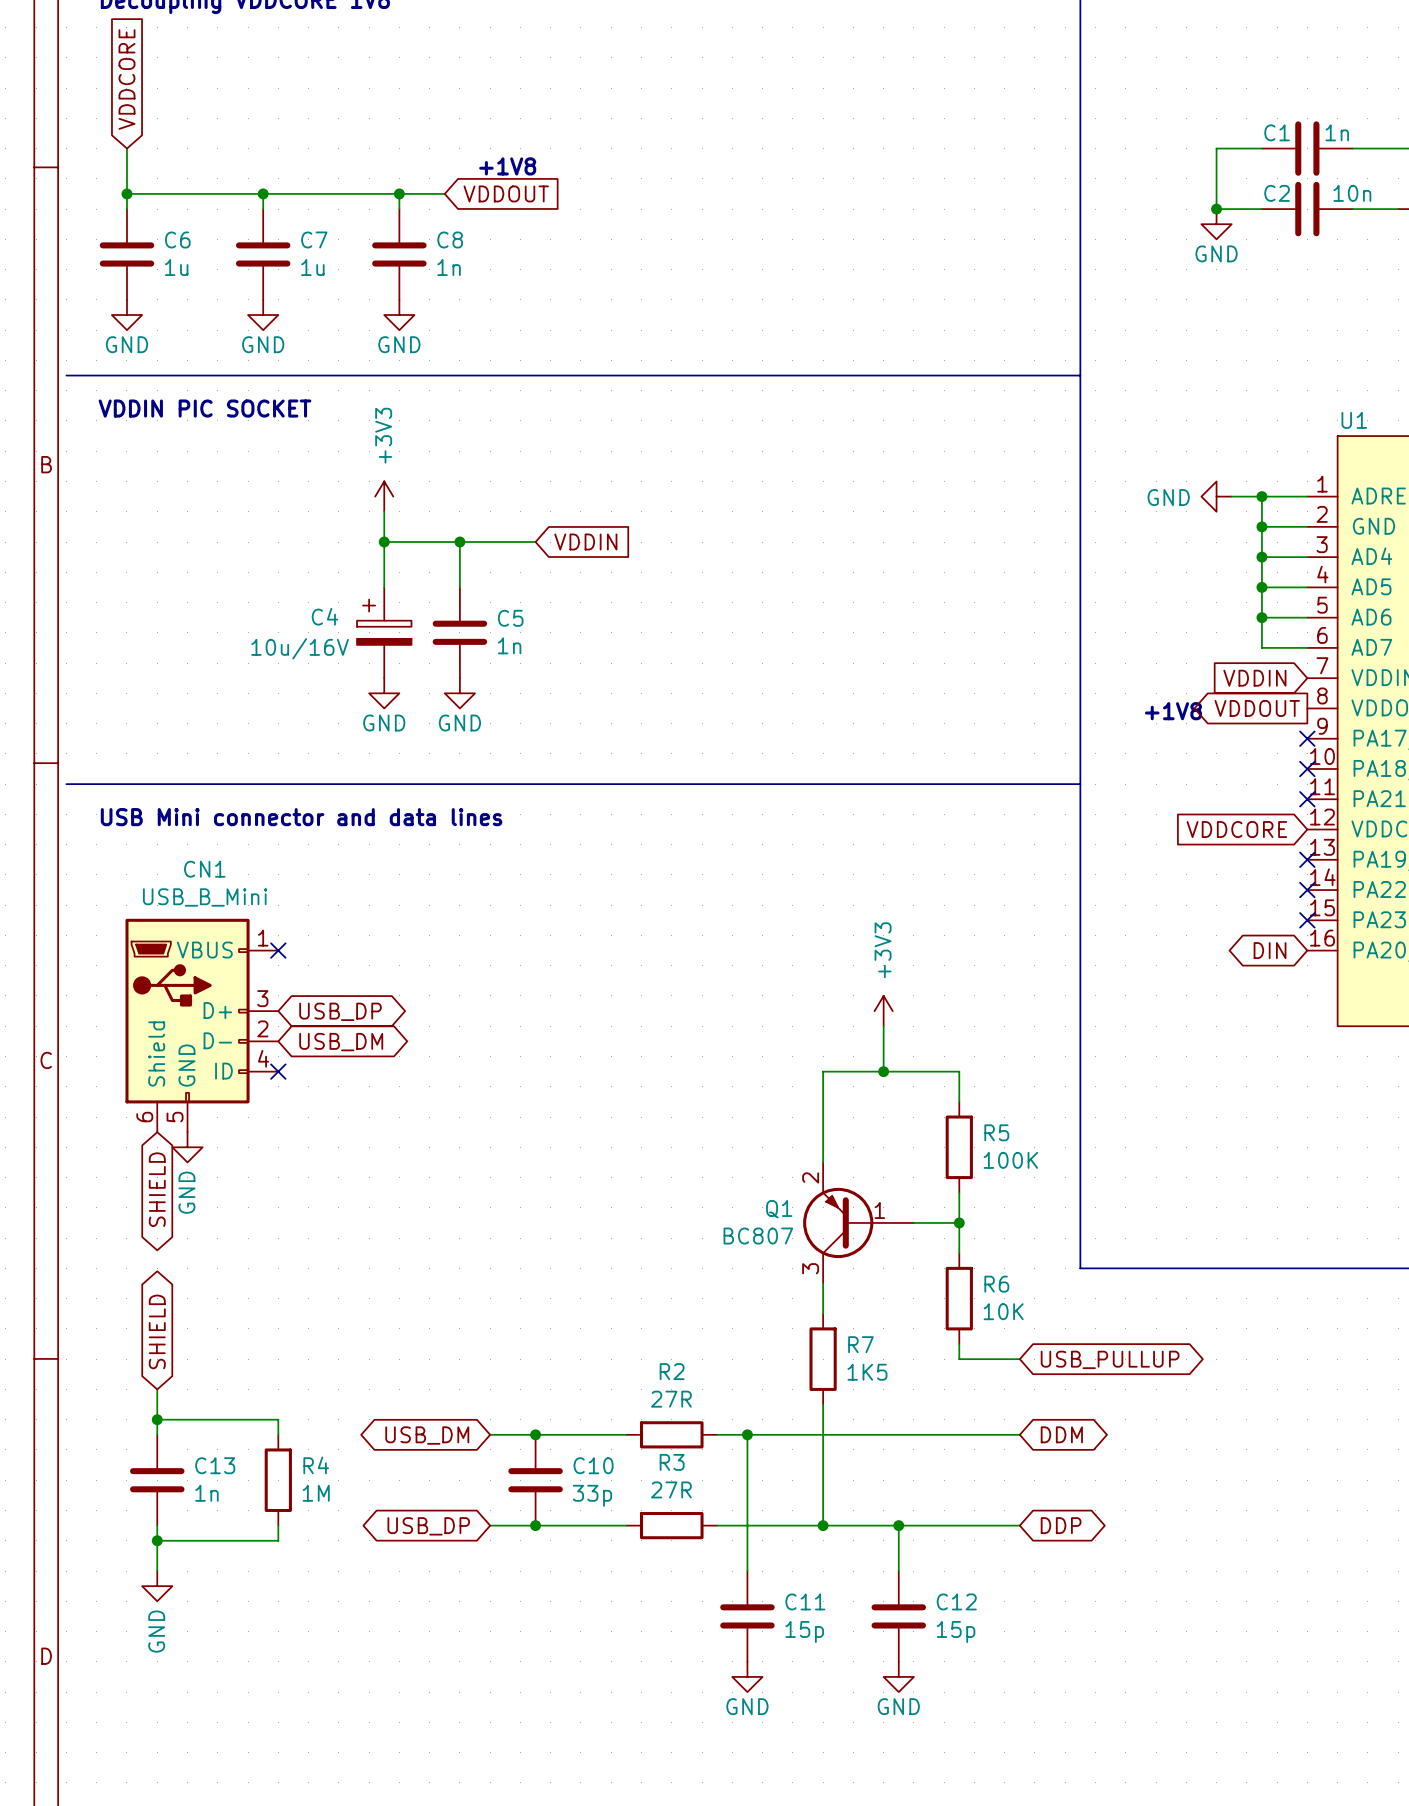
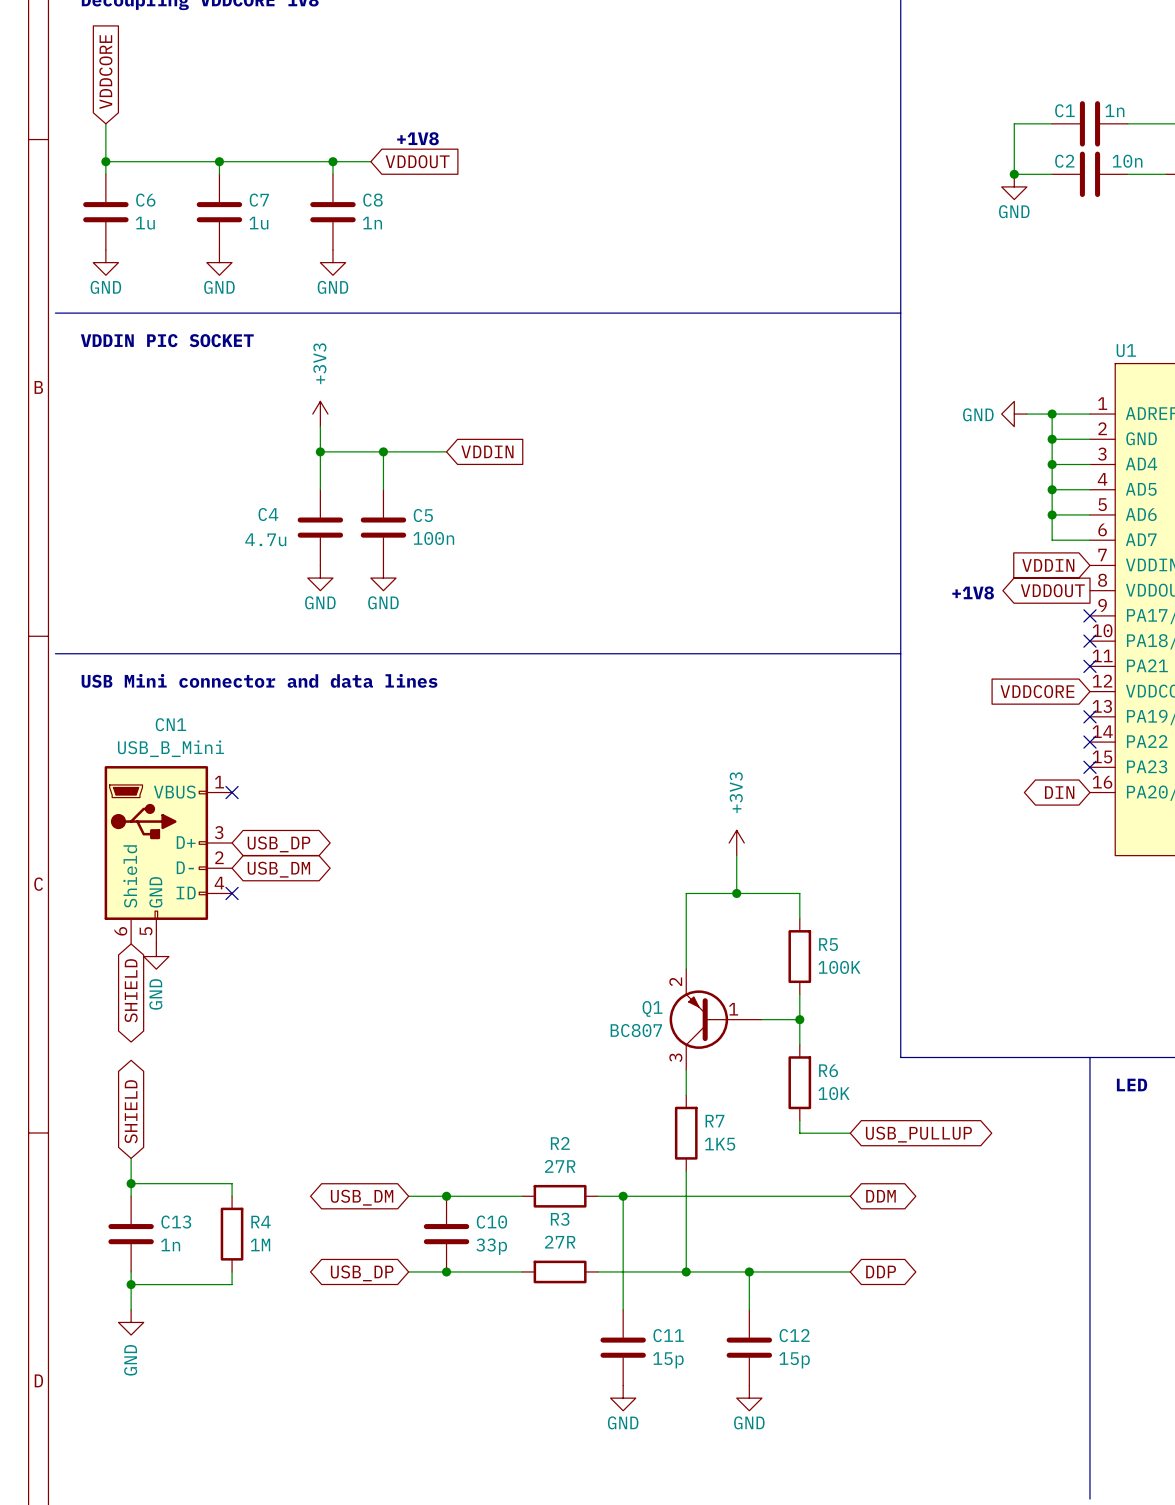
C4 symbol: [357, 587, 412, 679] -> [297, 489, 344, 566]
C5 value: 1n (509, 645) -> 100n (433, 538)
C4 value: 10u/16V (300, 648) -> 4.7u (265, 539)
line: none -> (1089, 1057) (1089, 1499)
text: none -> LED (1132, 1085)

